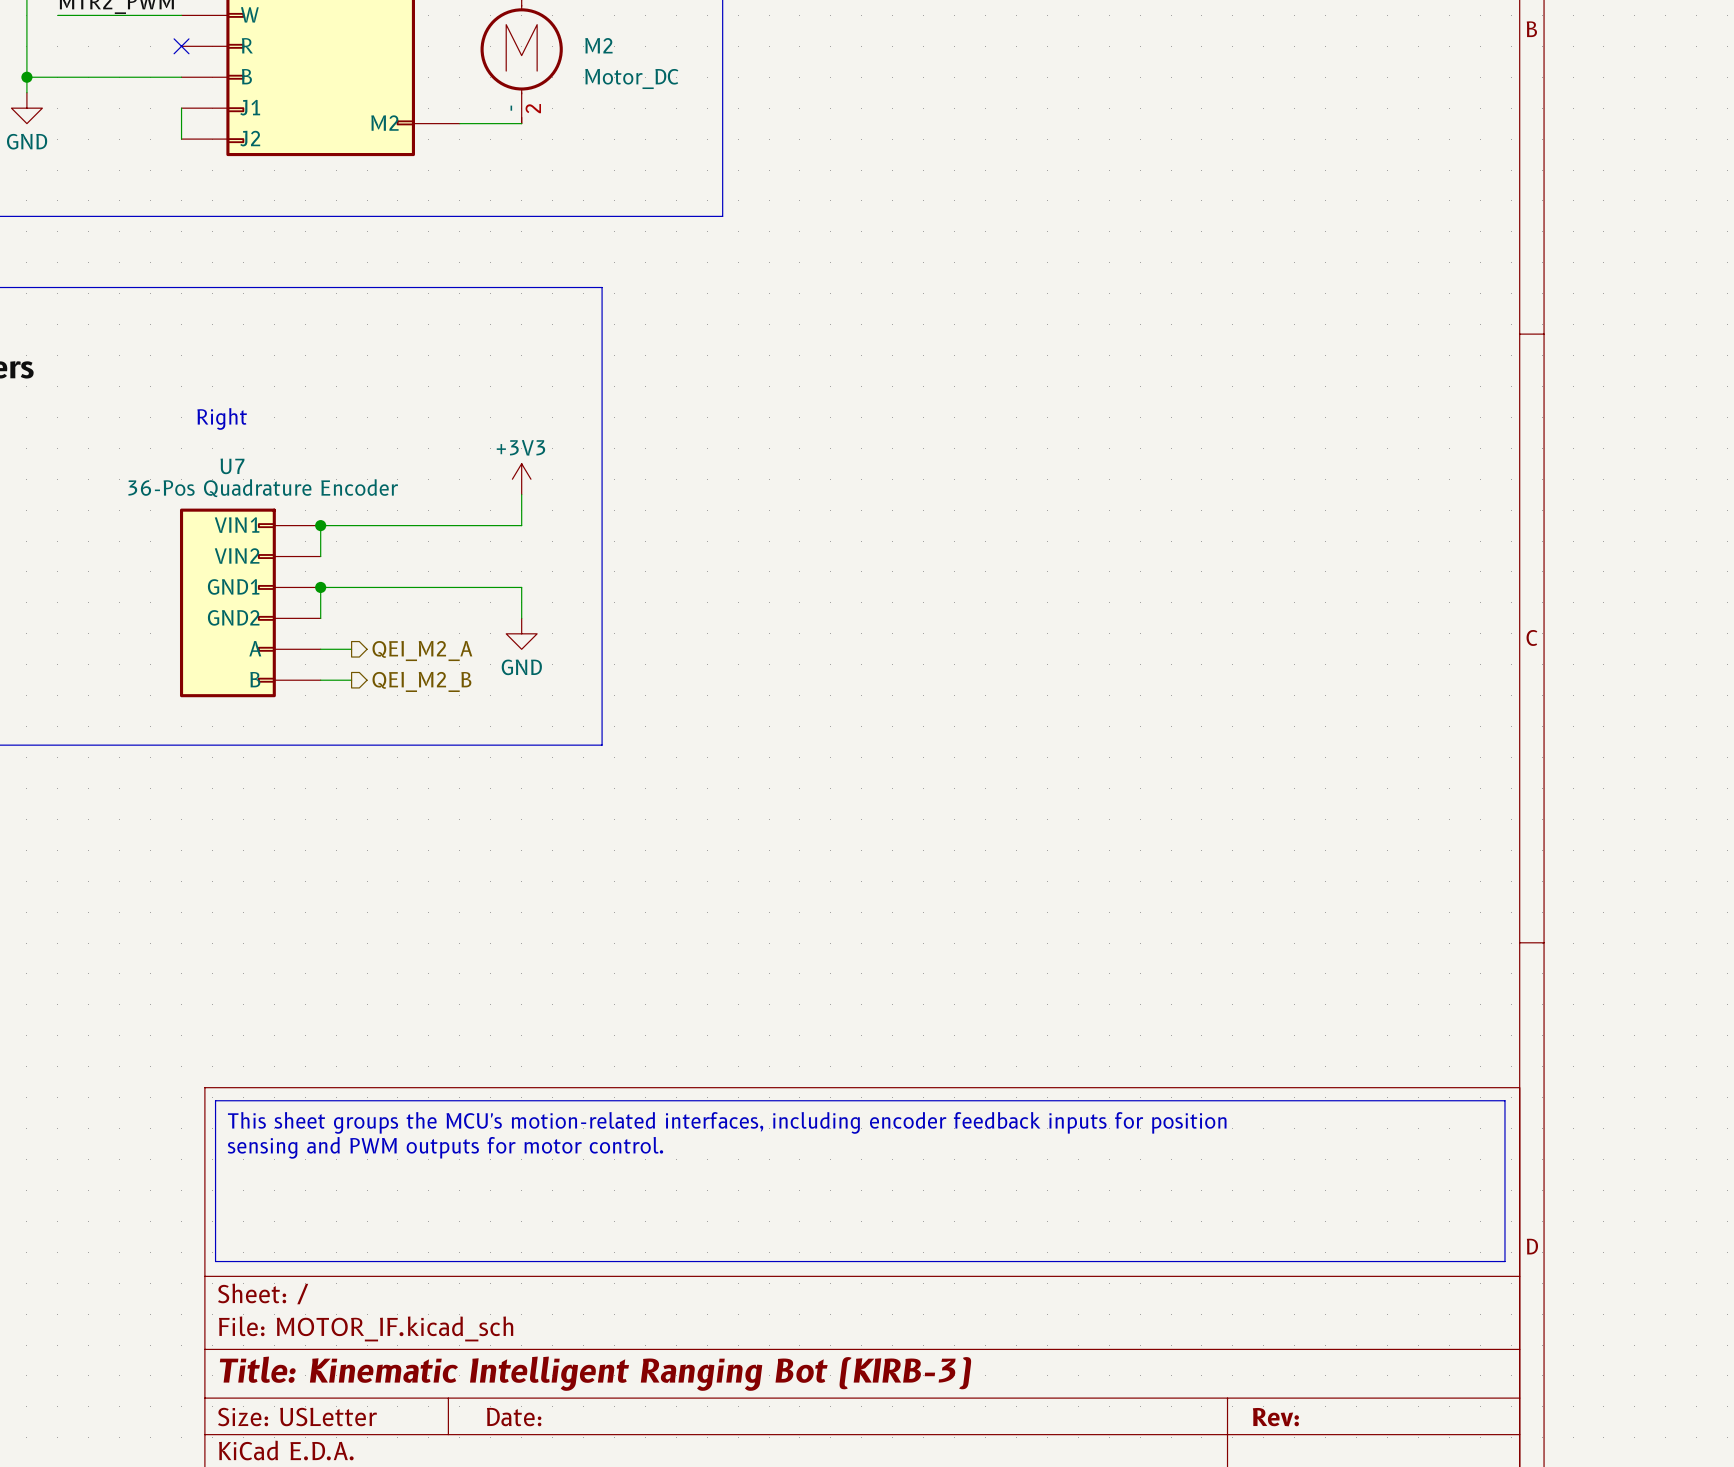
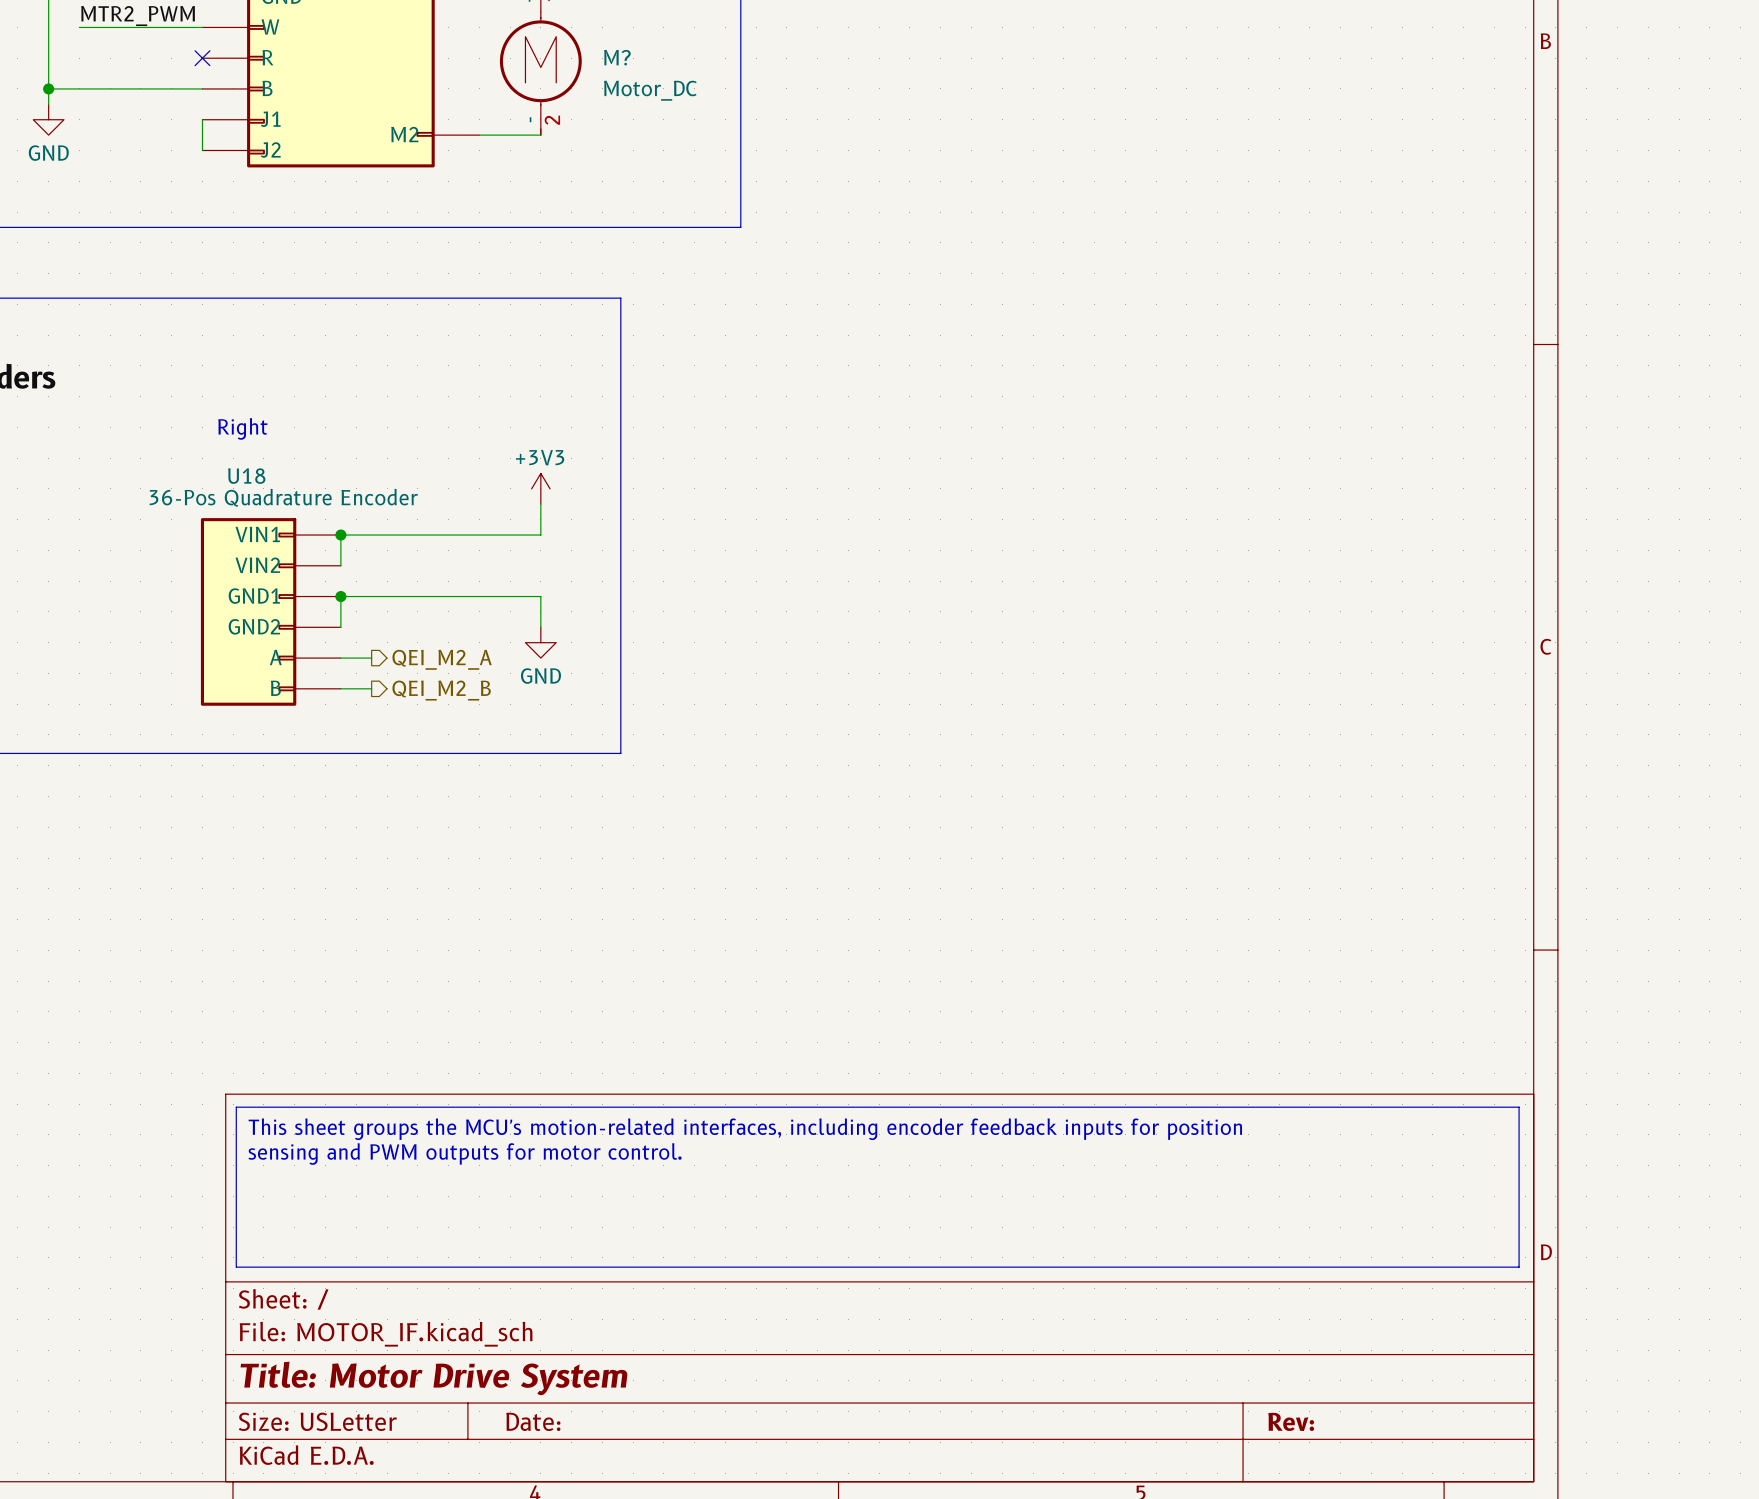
M2 name: M2 (598, 45) -> M? (617, 57)
U7 name: U7 (232, 466) -> U18 (246, 476)
title block: Title: Kinematic Intelligent Ranging Bot (KIRB-3) (595, 1373) -> Title: Motor Drive System (434, 1378)

